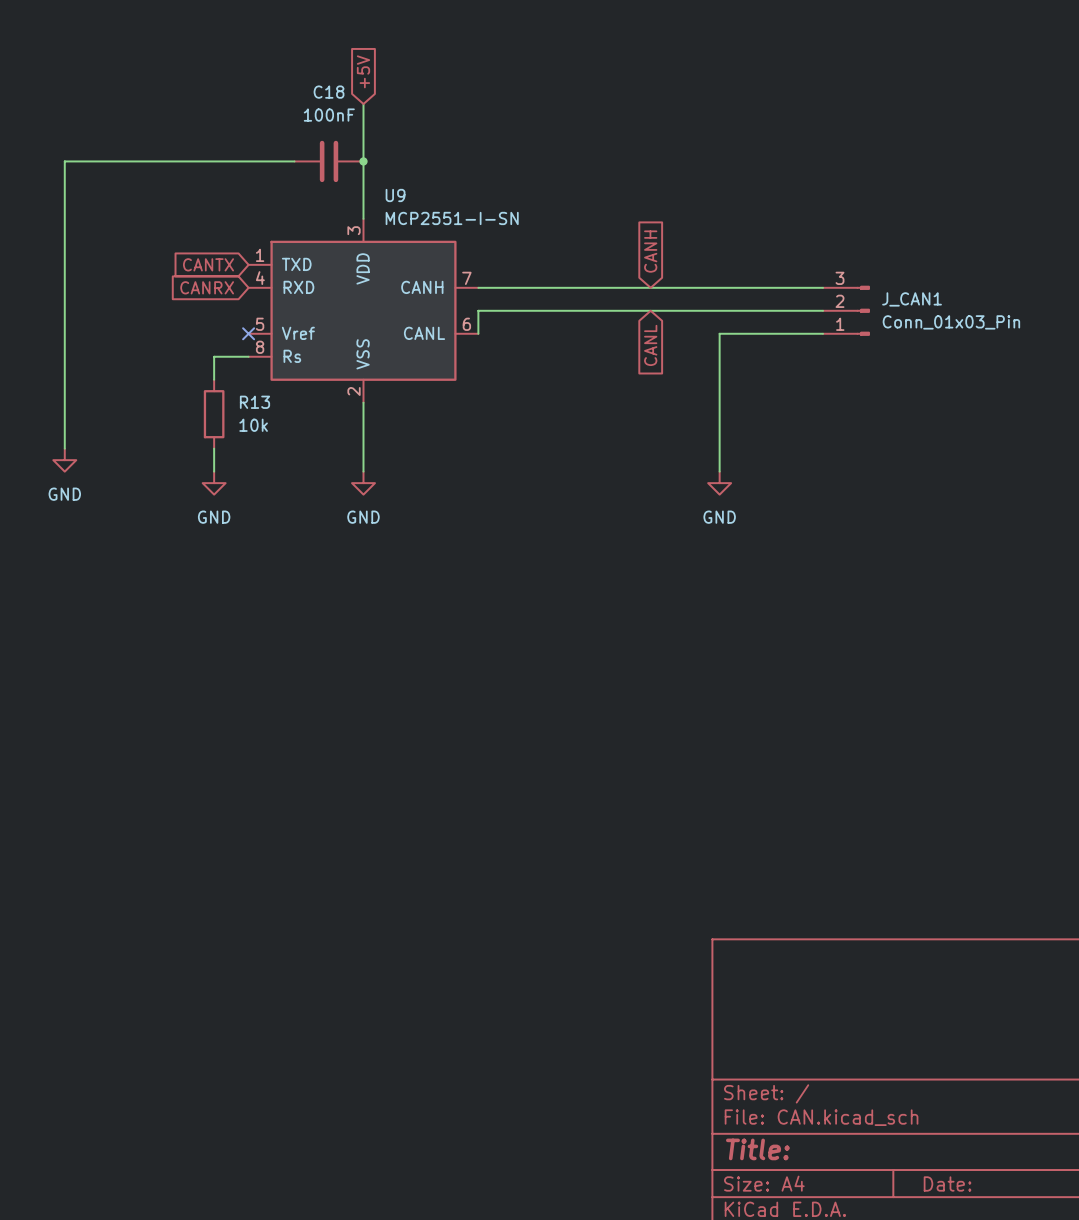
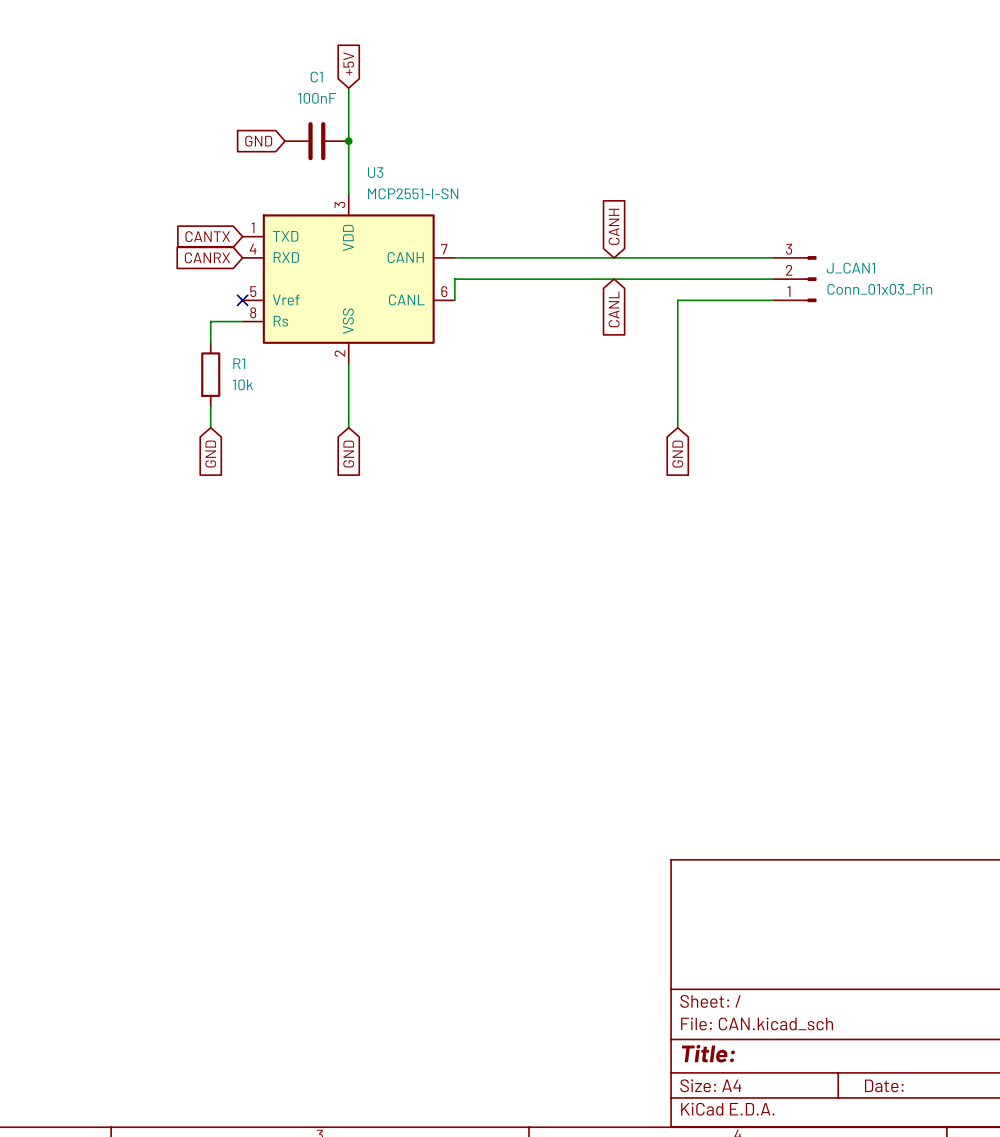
C18 name: C18 (329, 92) -> C1 (316, 77)
global label: none -> GND (258, 141)
wire: (294, 161) (64, 161) (64, 448) -> none
U9 name: U9 (395, 195) -> U3 (375, 172)
R13 name: R13 (254, 402) -> R1 (239, 363)
power symbol: GND (64, 460) -> none
power symbol: GND (214, 483) -> none
power symbol: GND (363, 483) -> none
power symbol: GND (719, 483) -> none
global label: none -> GND (210, 454)
global label: none -> GND (348, 454)
global label: none -> GND (677, 454)

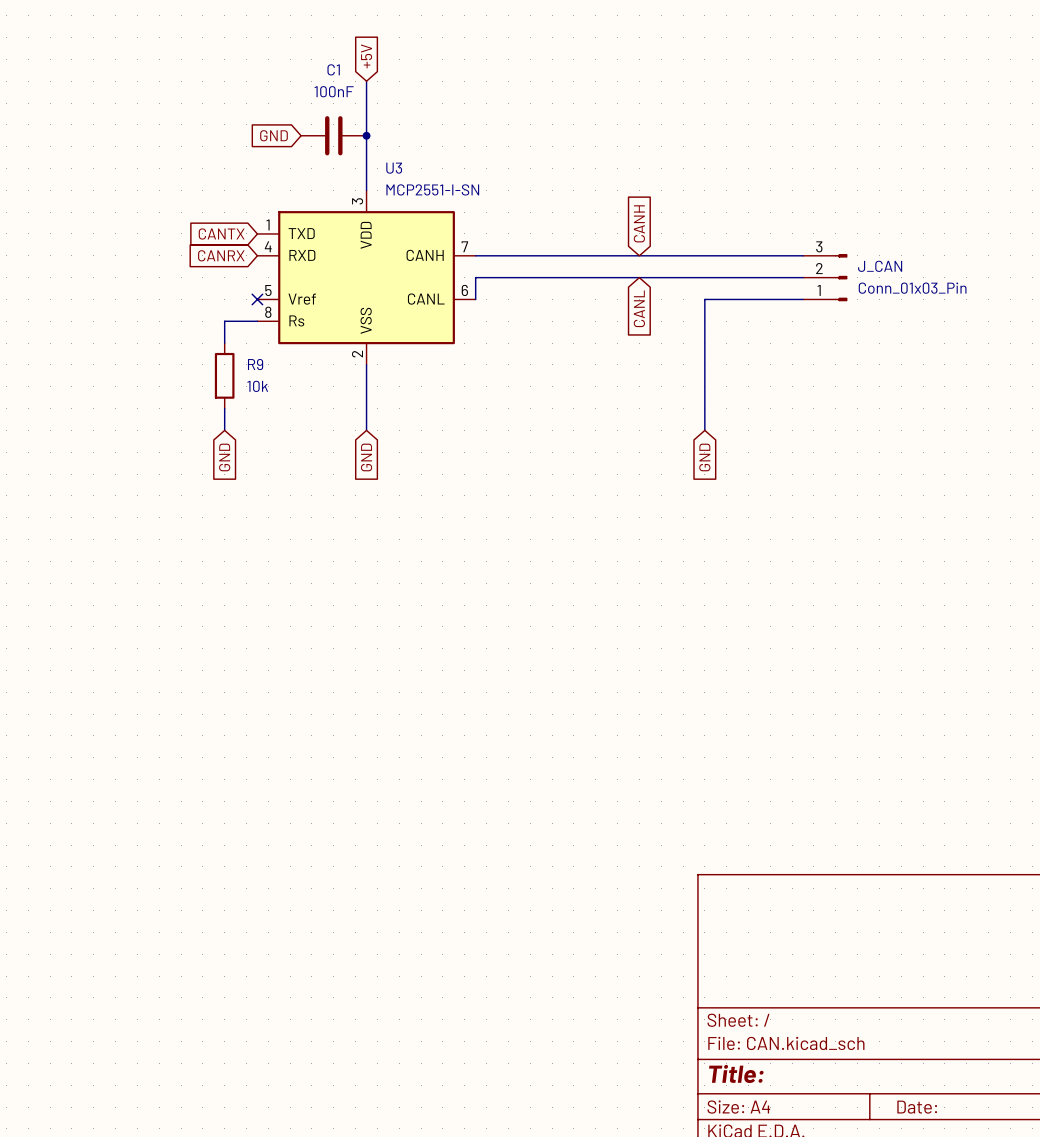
J_CAN1 name: J_CAN1 (850, 268) -> J_CAN (880, 266)
R1 name: R1 (239, 363) -> R9 (255, 364)

